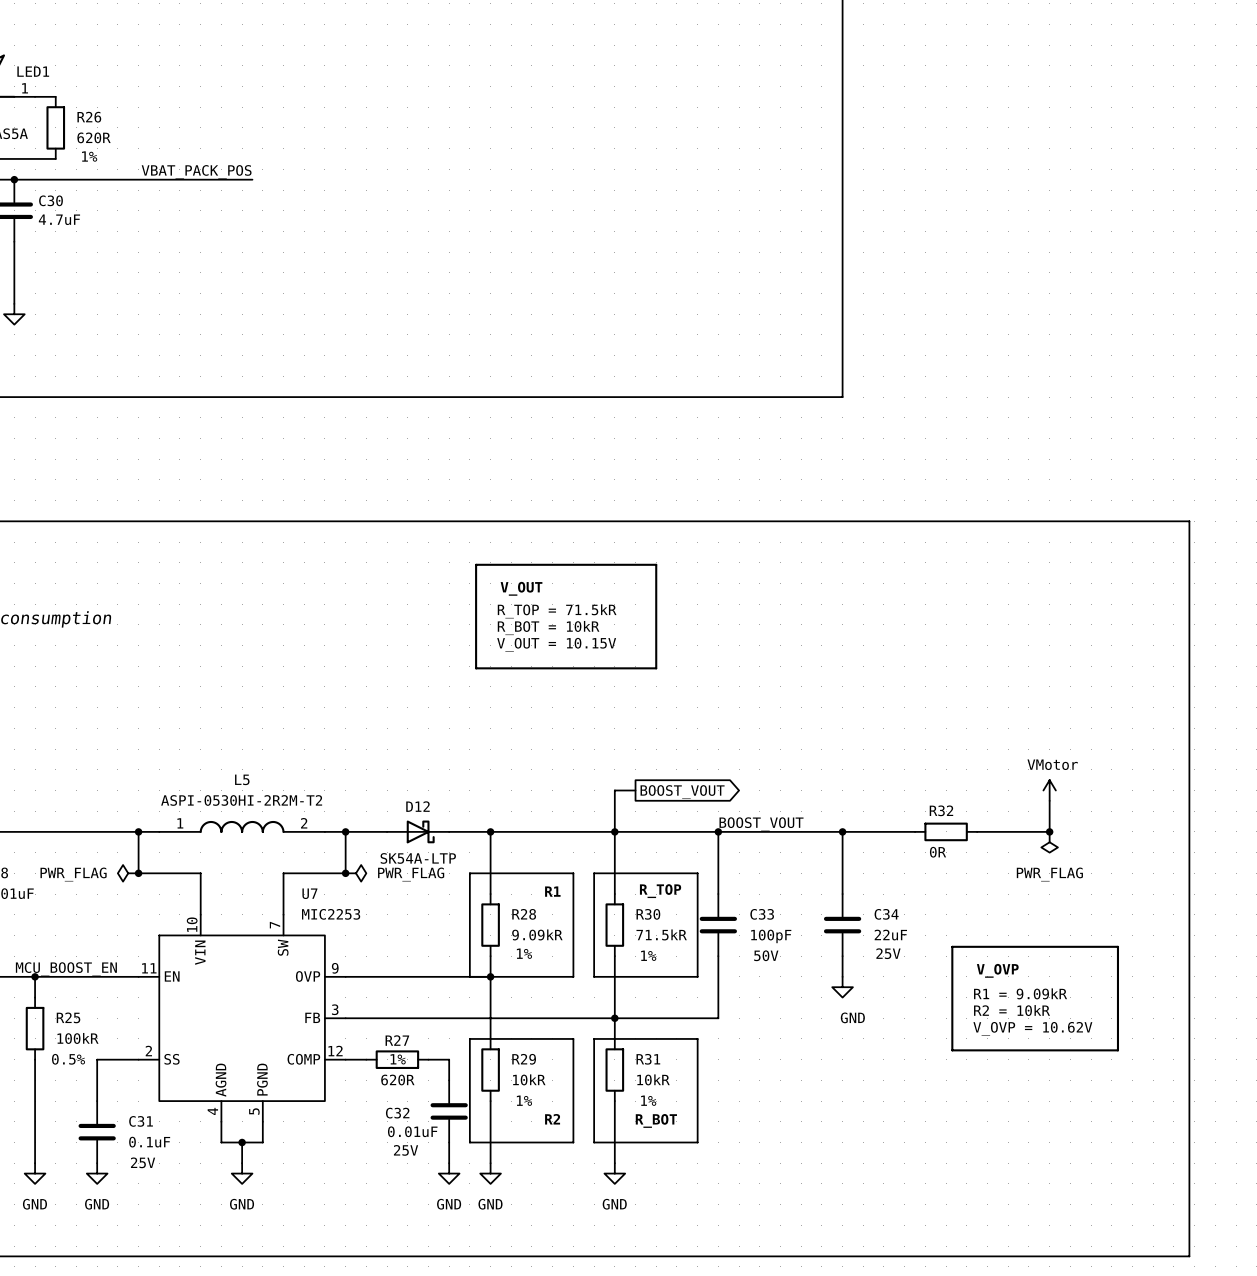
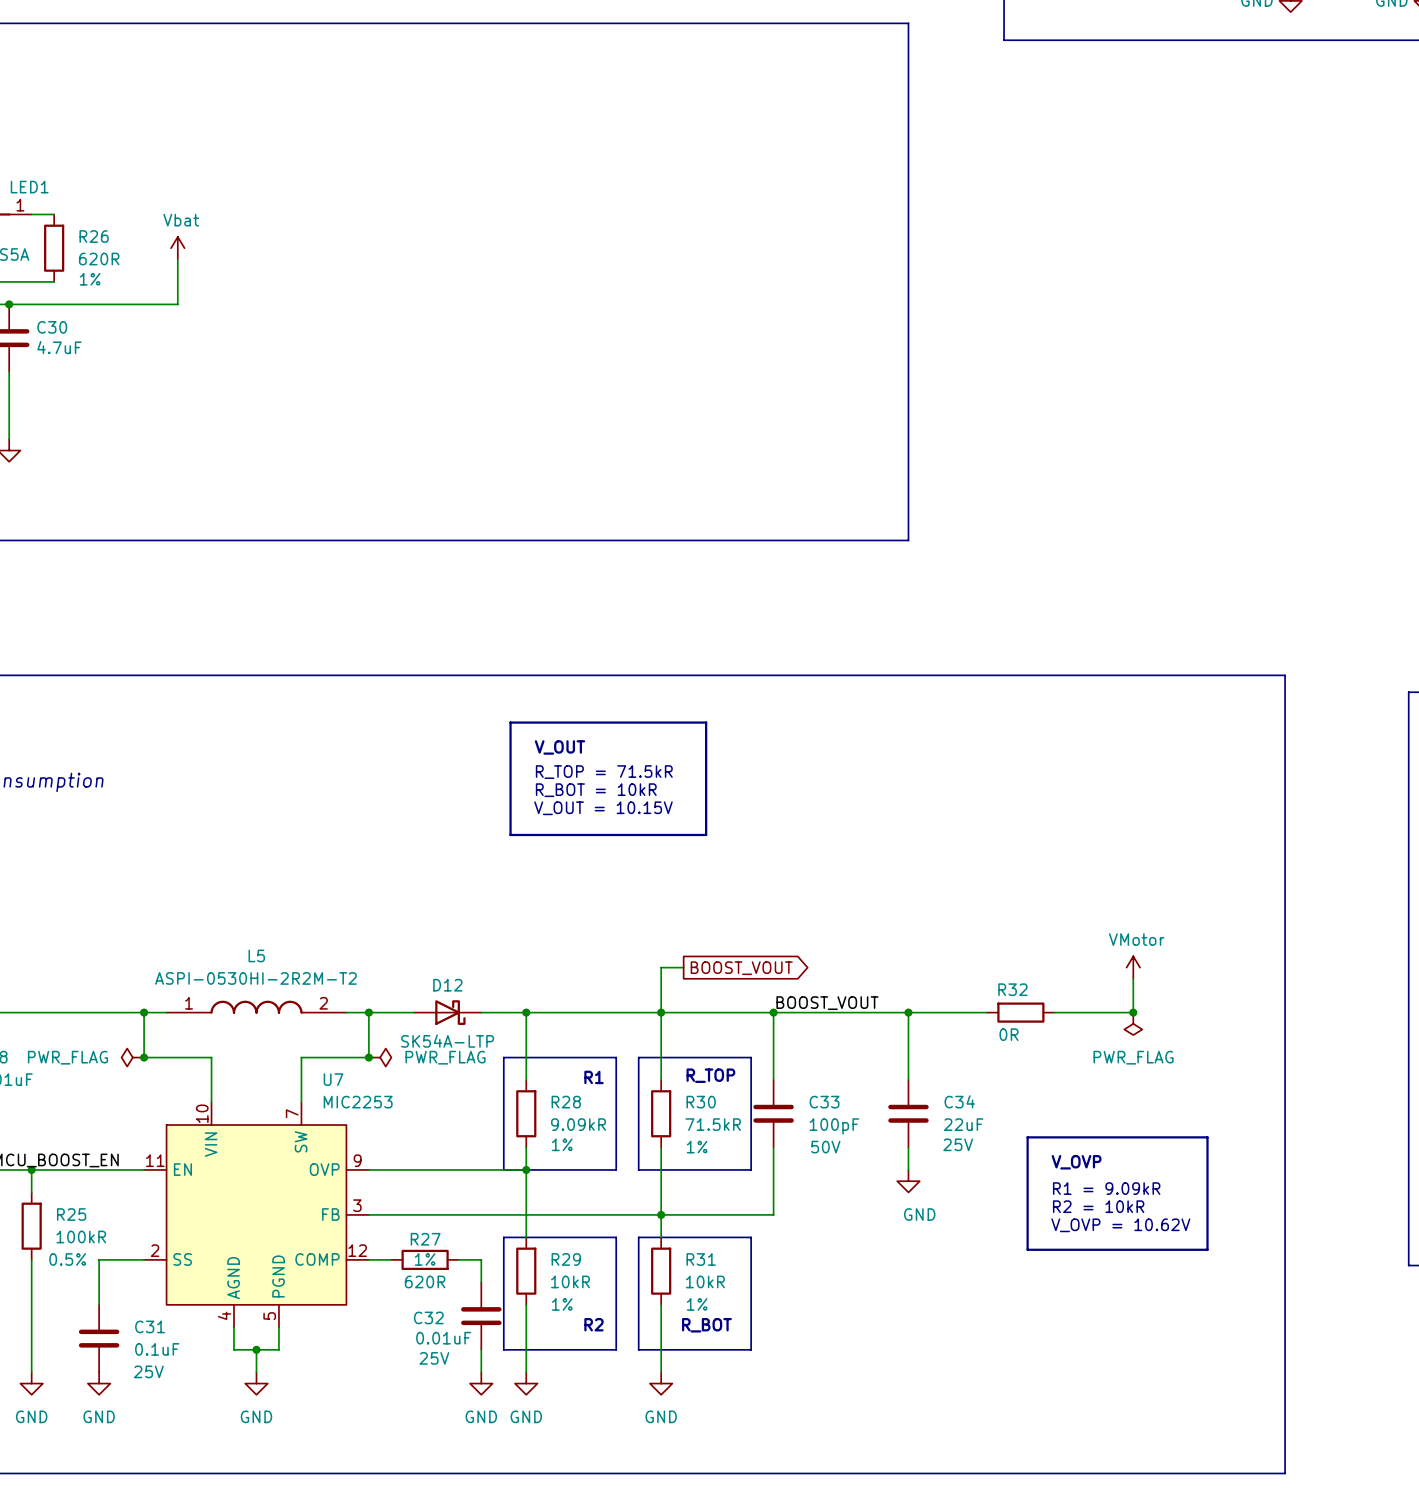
power symbol: none -> Vbat (177, 248)
label: VBAT_PACK_POS (196, 172) -> none
wire: (169, 179) (252, 179) -> (177, 304) (177, 259)

